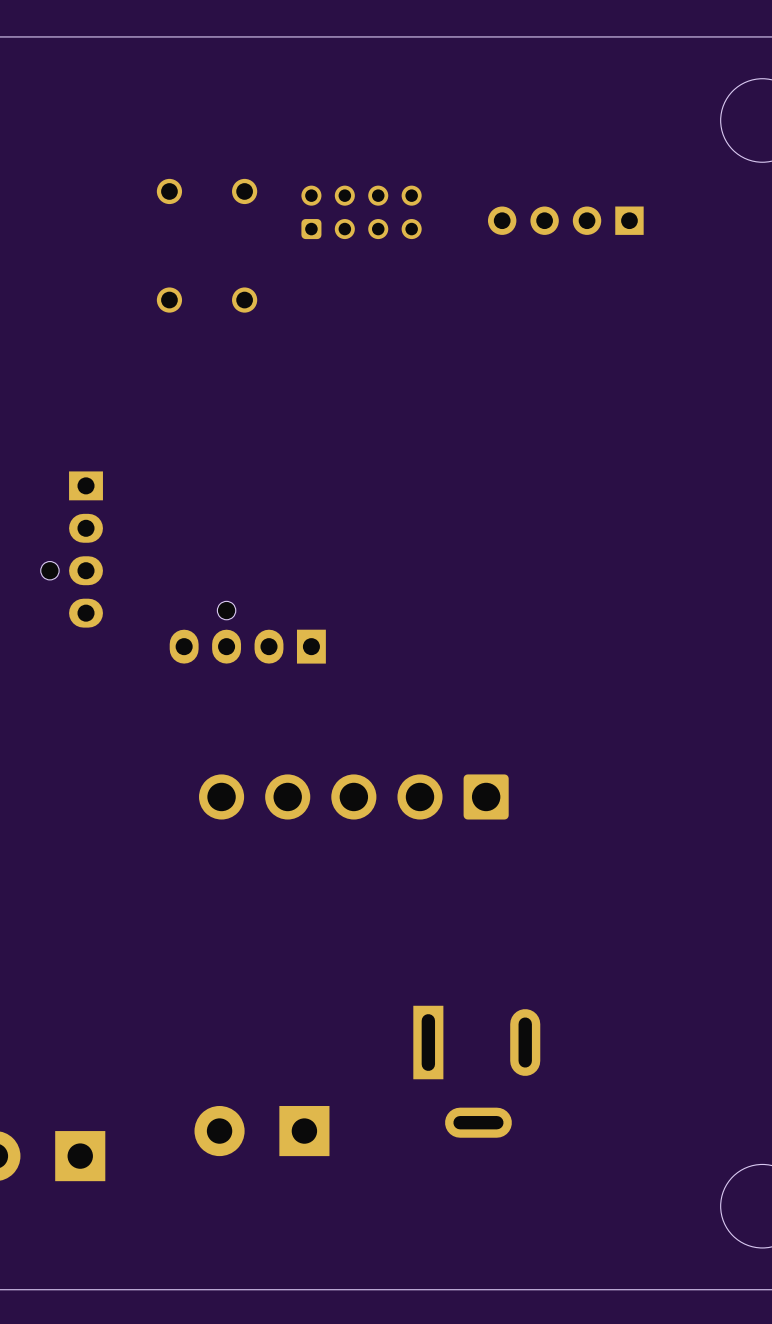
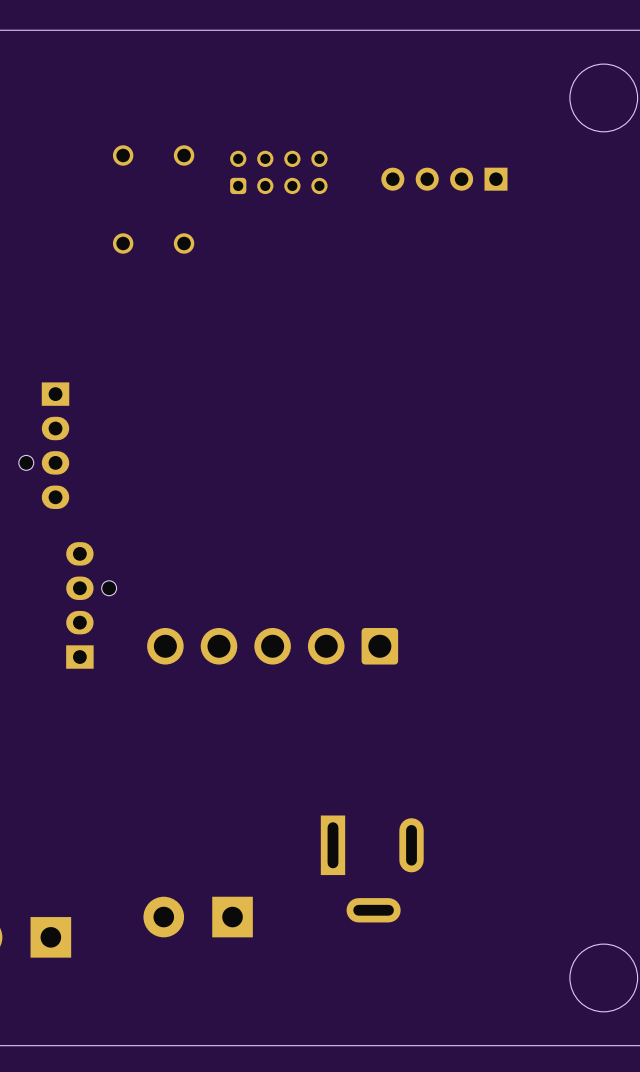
part rotation: 0° (247, 632) -> 90° clockwise (91, 605)
part position: (247, 632) -> (91, 605)

